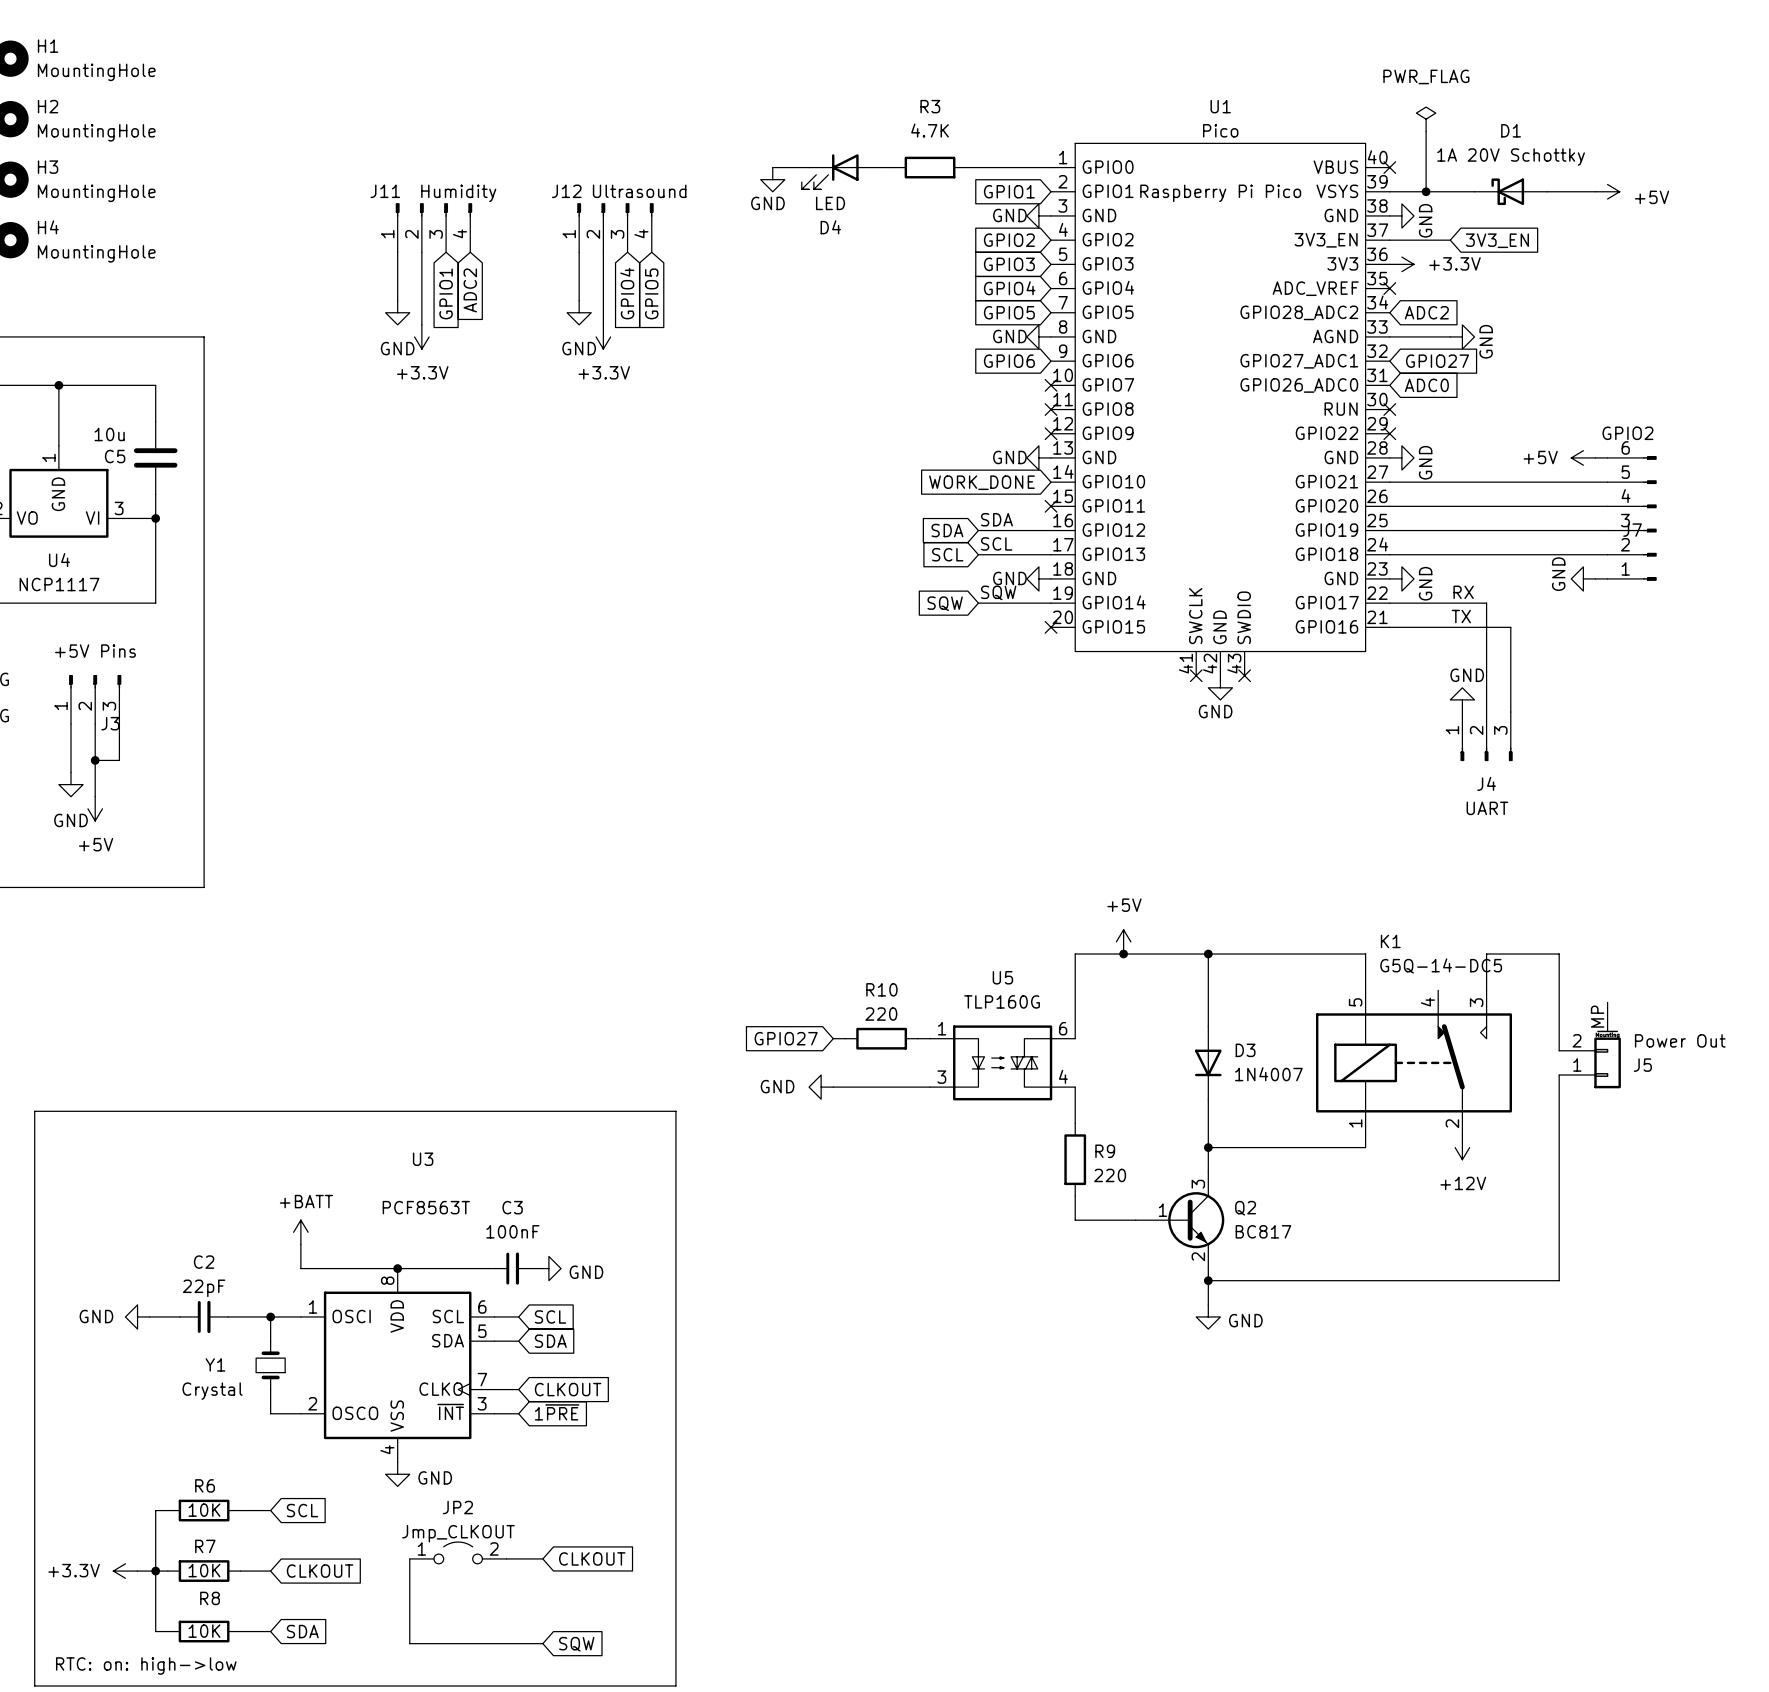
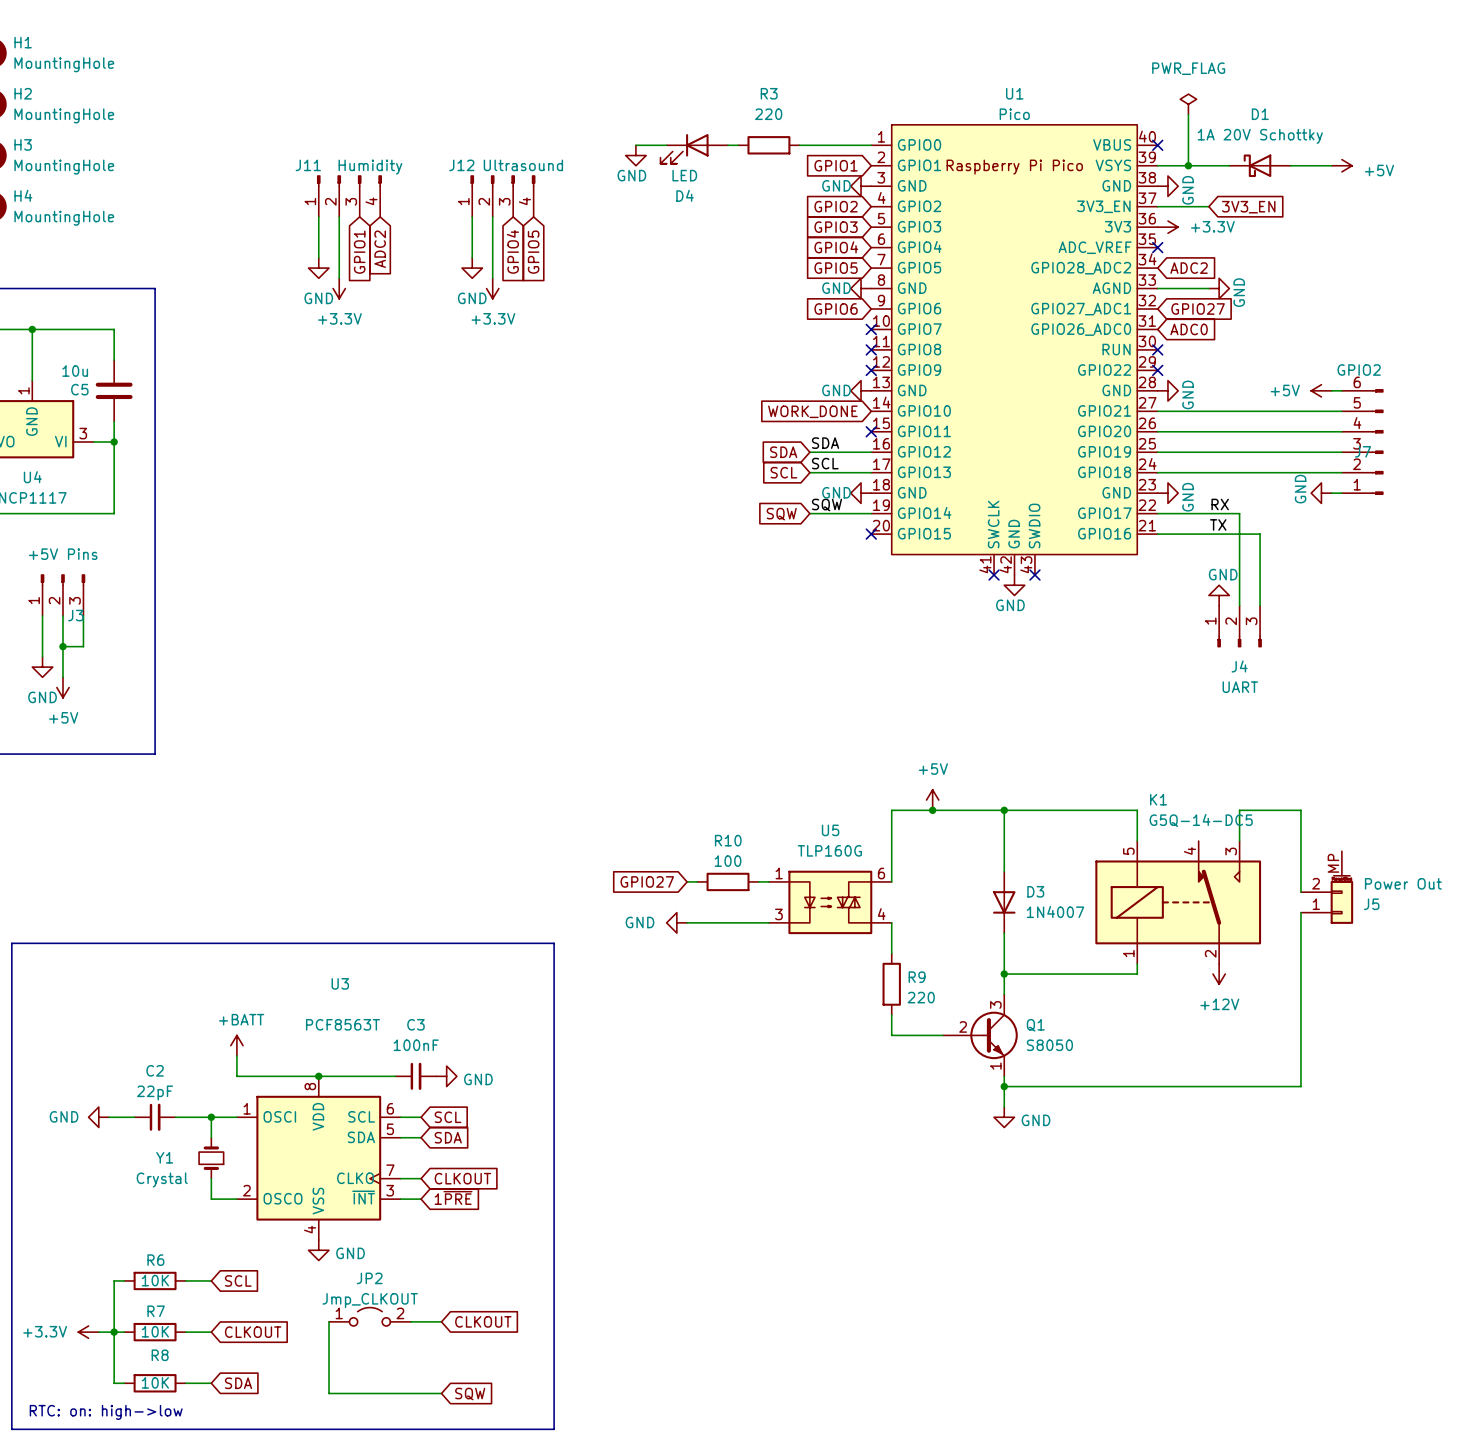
R3 value: 4.7K (930, 130) -> 220 (768, 114)
R10 value: 220 (881, 1014) -> 100 (728, 861)
Q2: BC817 (1180, 1220) -> none
Q1: none -> S8050 (980, 1035)

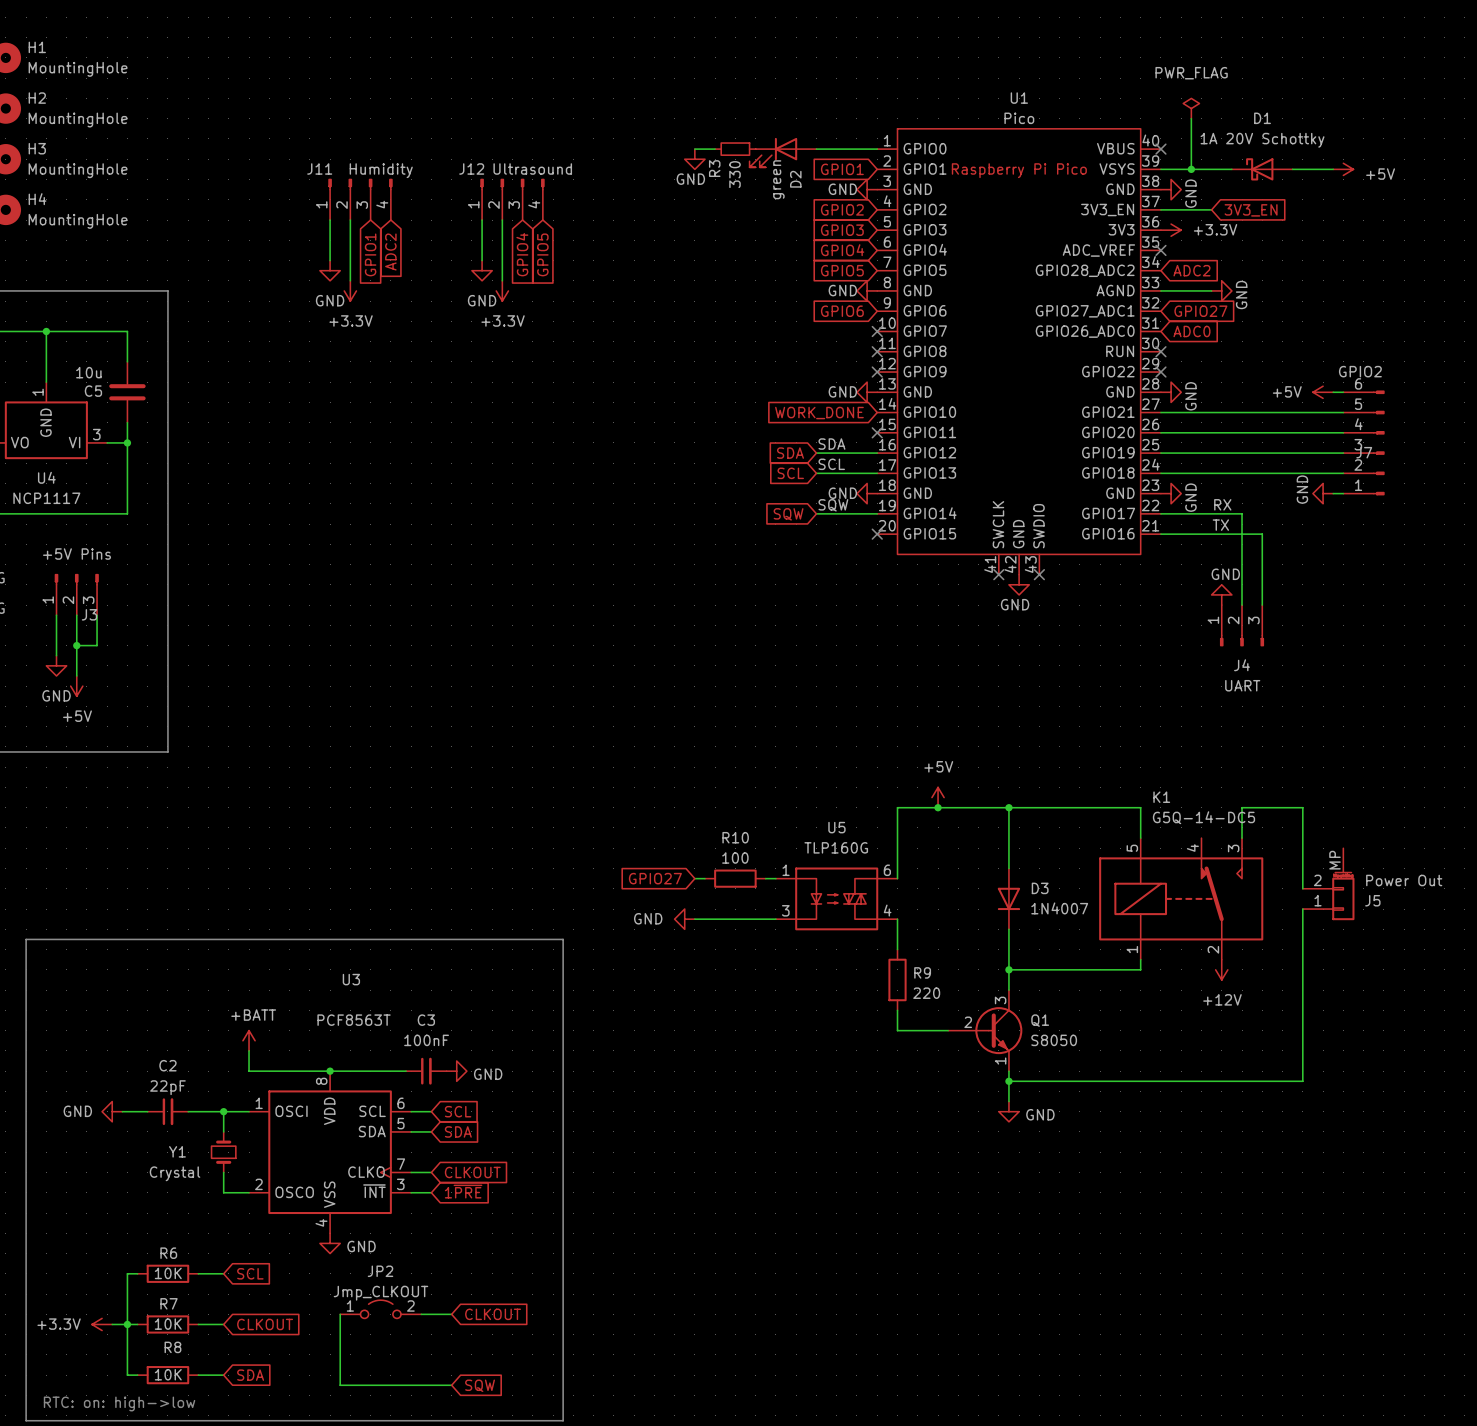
R3 name position: R3 (769, 93) -> R3 (714, 168)
R3 value: 220 (768, 114) -> 330 (735, 174)
R3 symbol: [738, 136, 800, 155] -> [715, 142, 756, 156]
wire: (635, 145) (666, 145) -> none
wire: (728, 145) (738, 145) -> none
D4: LED (694, 148) -> none
D2: none -> green (783, 152)
power symbol position: GND (635, 155) -> GND (694, 159)

